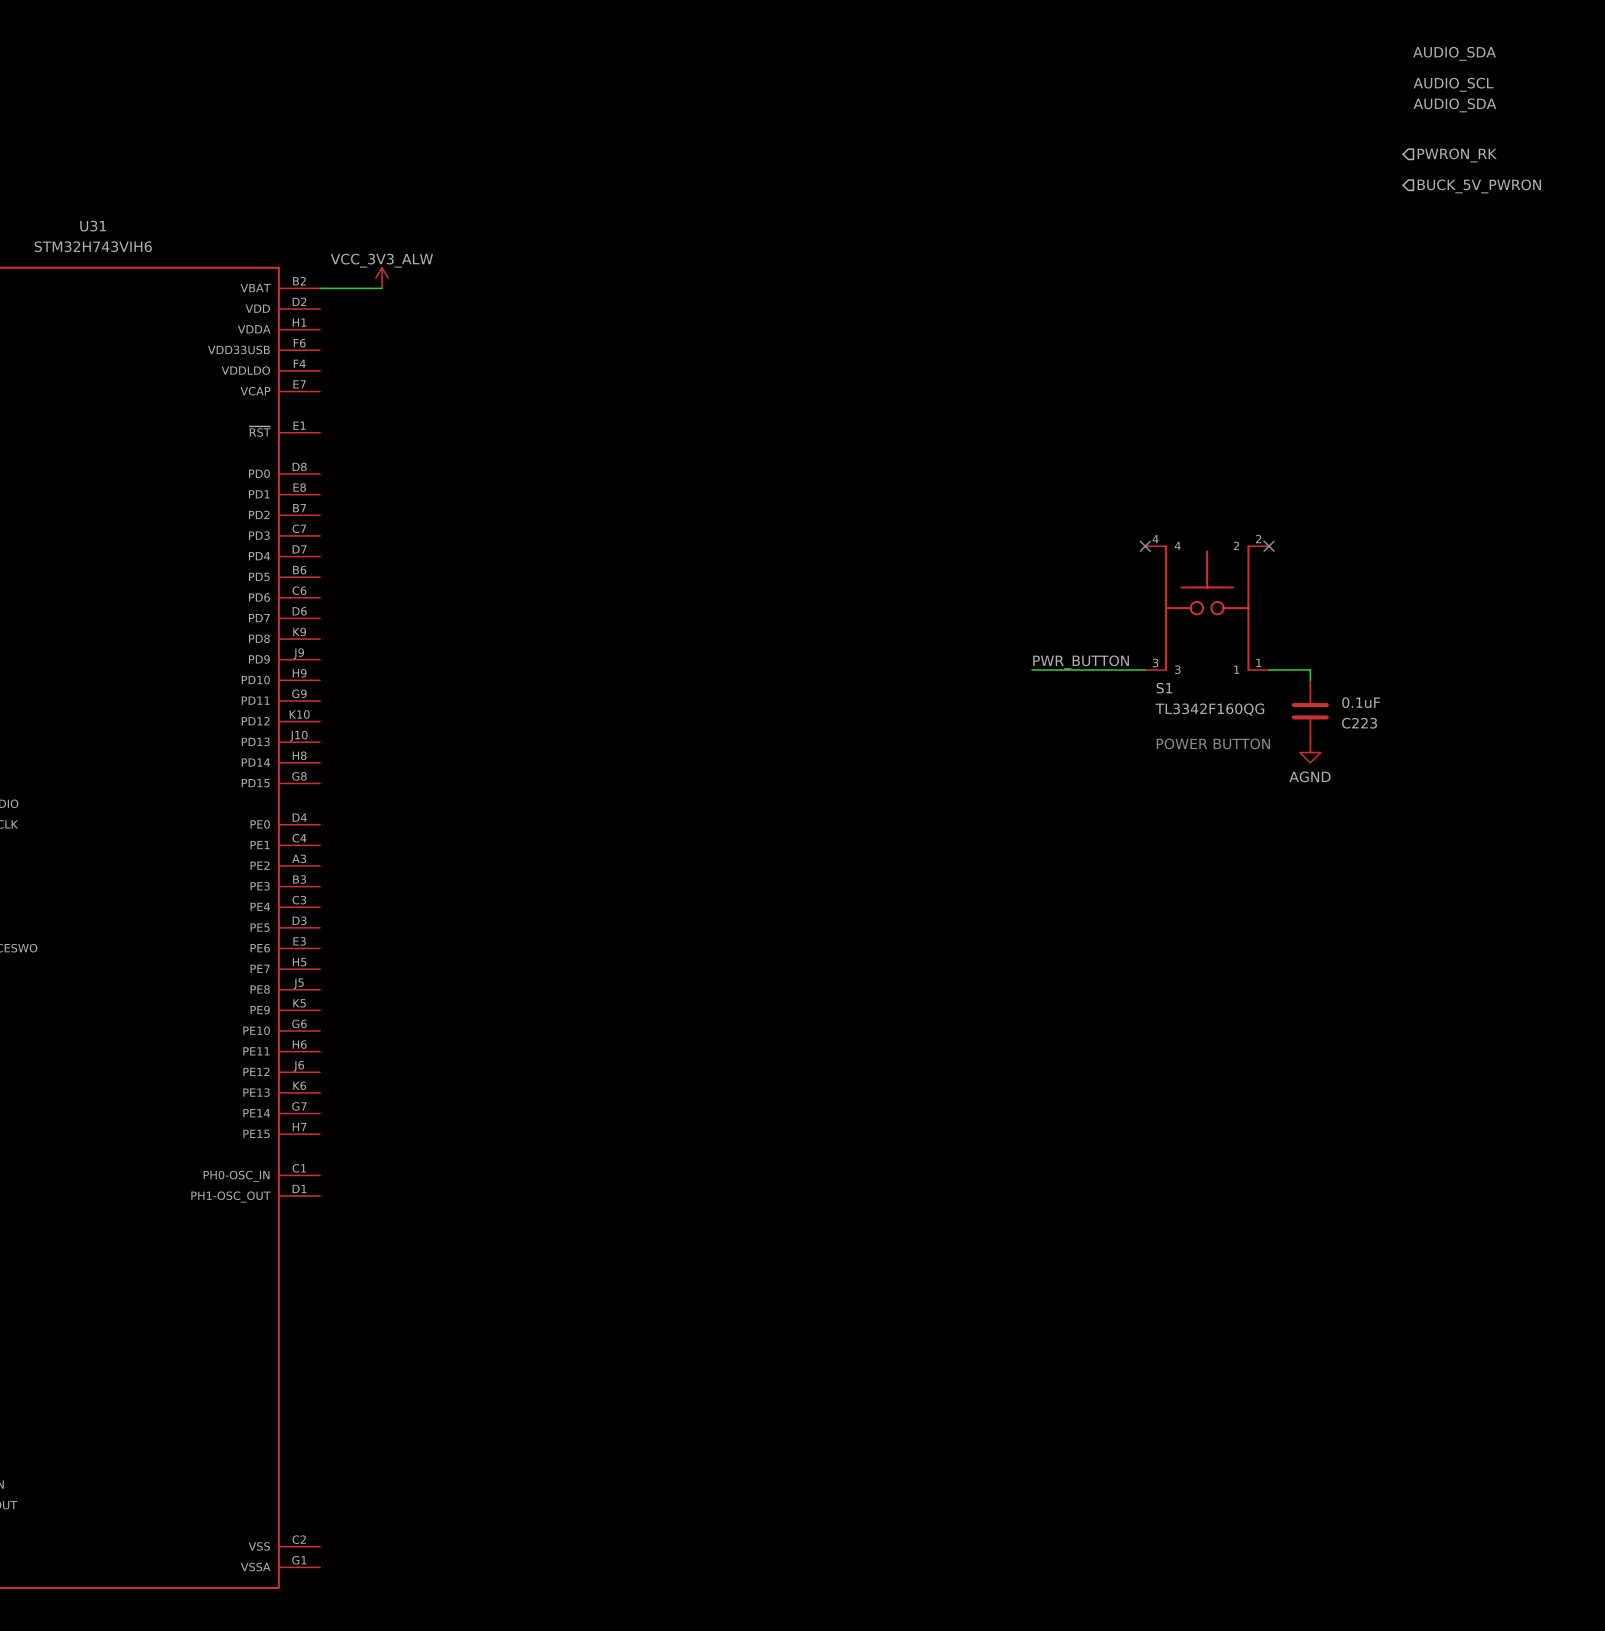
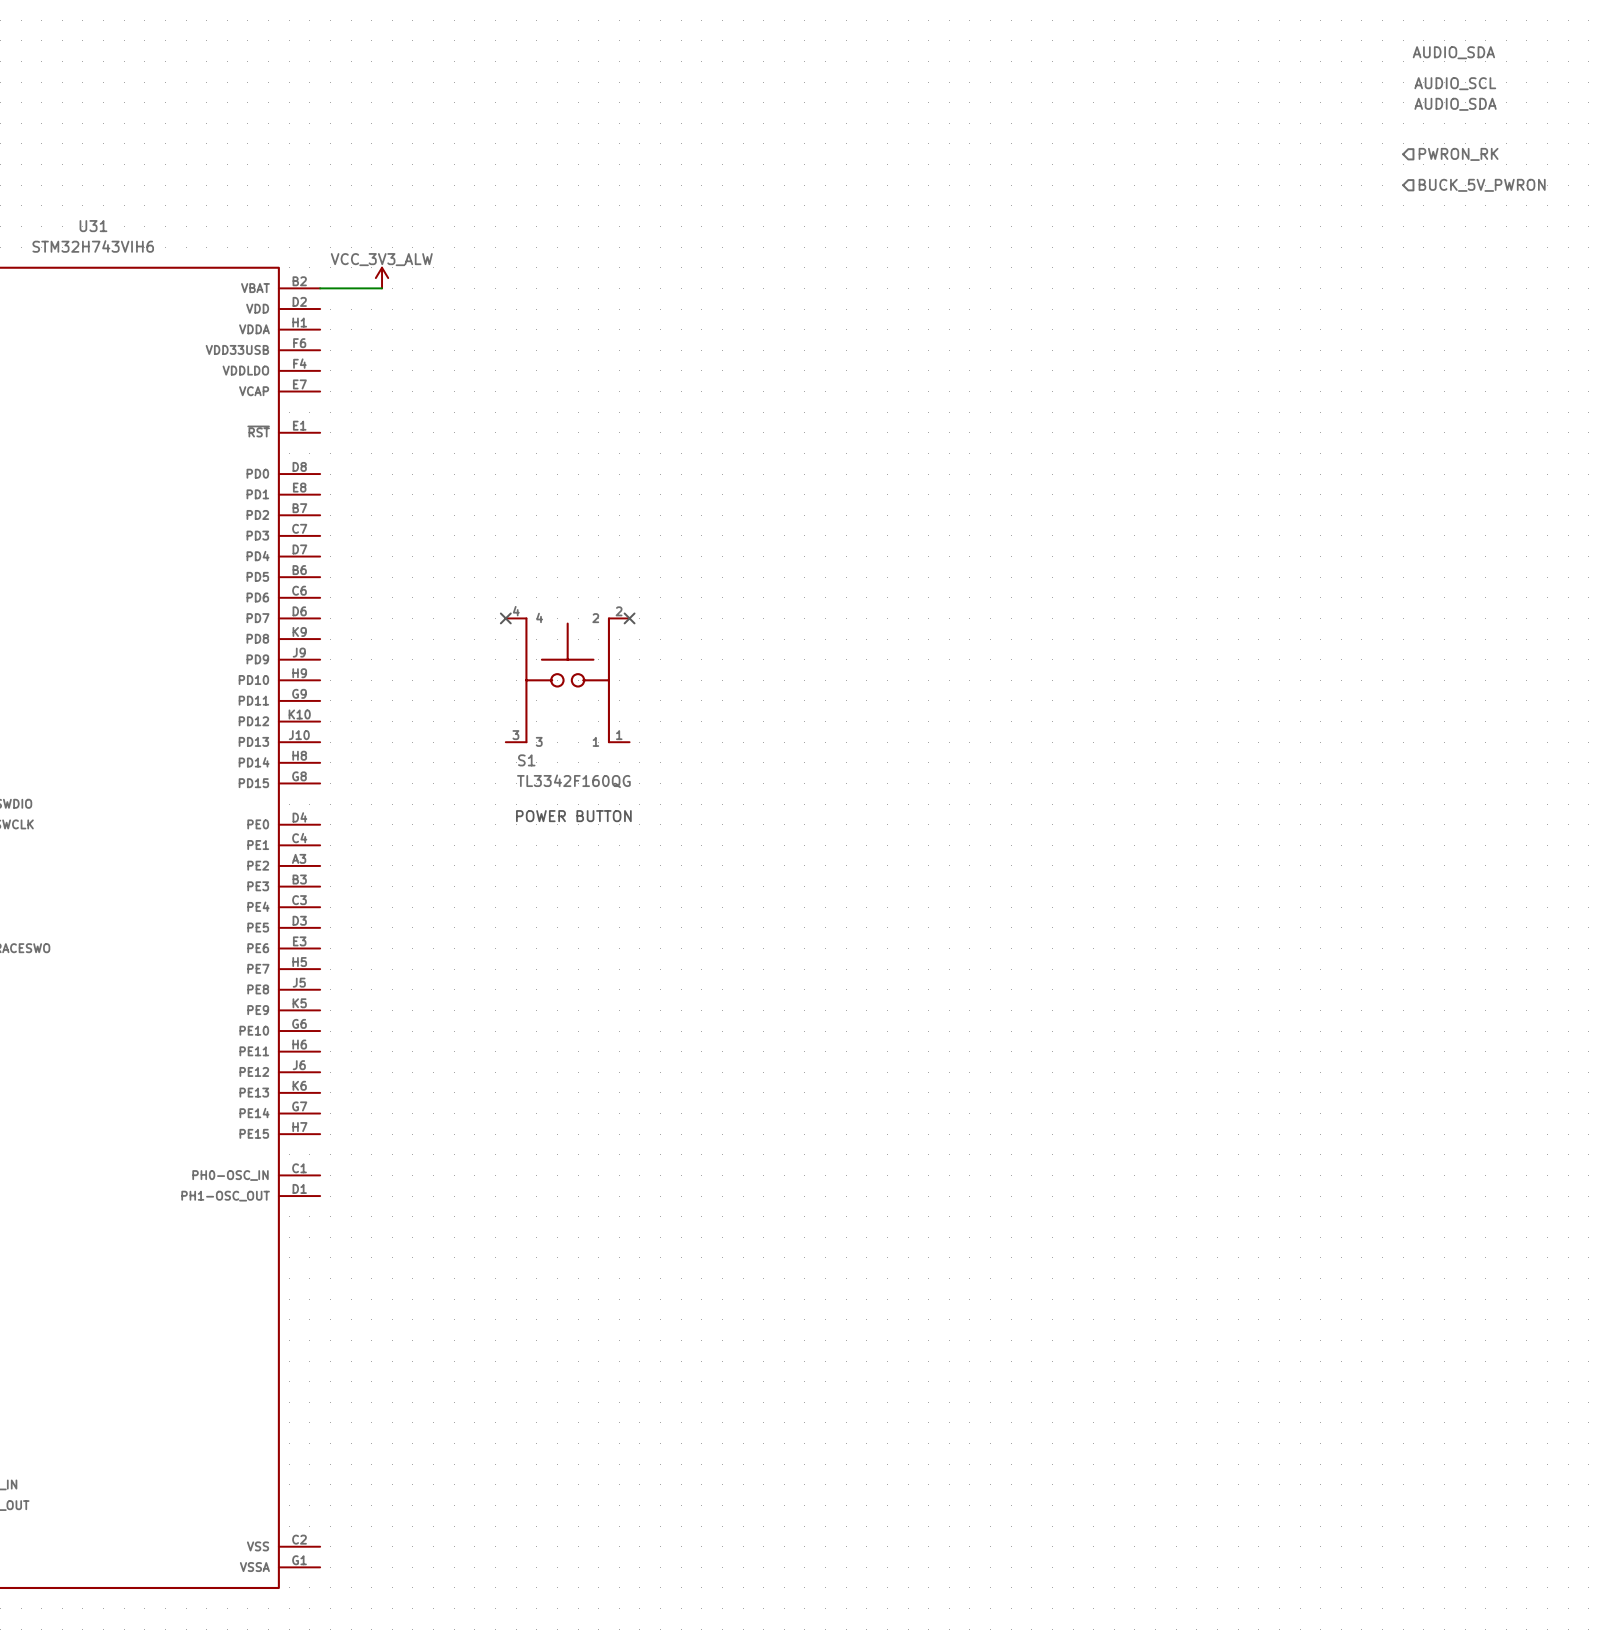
no-connect mark: (1145, 546) -> none
no-connect mark: (1269, 546) -> none
S1 position: (1207, 608) -> (567, 680)
no-connect mark: none -> (505, 618)
no-connect mark: none -> (629, 618)
label: PWR_BUTTON (1081, 662) -> none
wire: (1031, 670) (1145, 670) -> none
wire: (1269, 670) (1310, 670) (1310, 680) -> none
C223: 0.1uF (1310, 711) -> none
text: POWER BUTTON (1213, 743) -> none
power symbol: AGND (1310, 752) -> none
text: none -> POWER BUTTON (573, 816)

